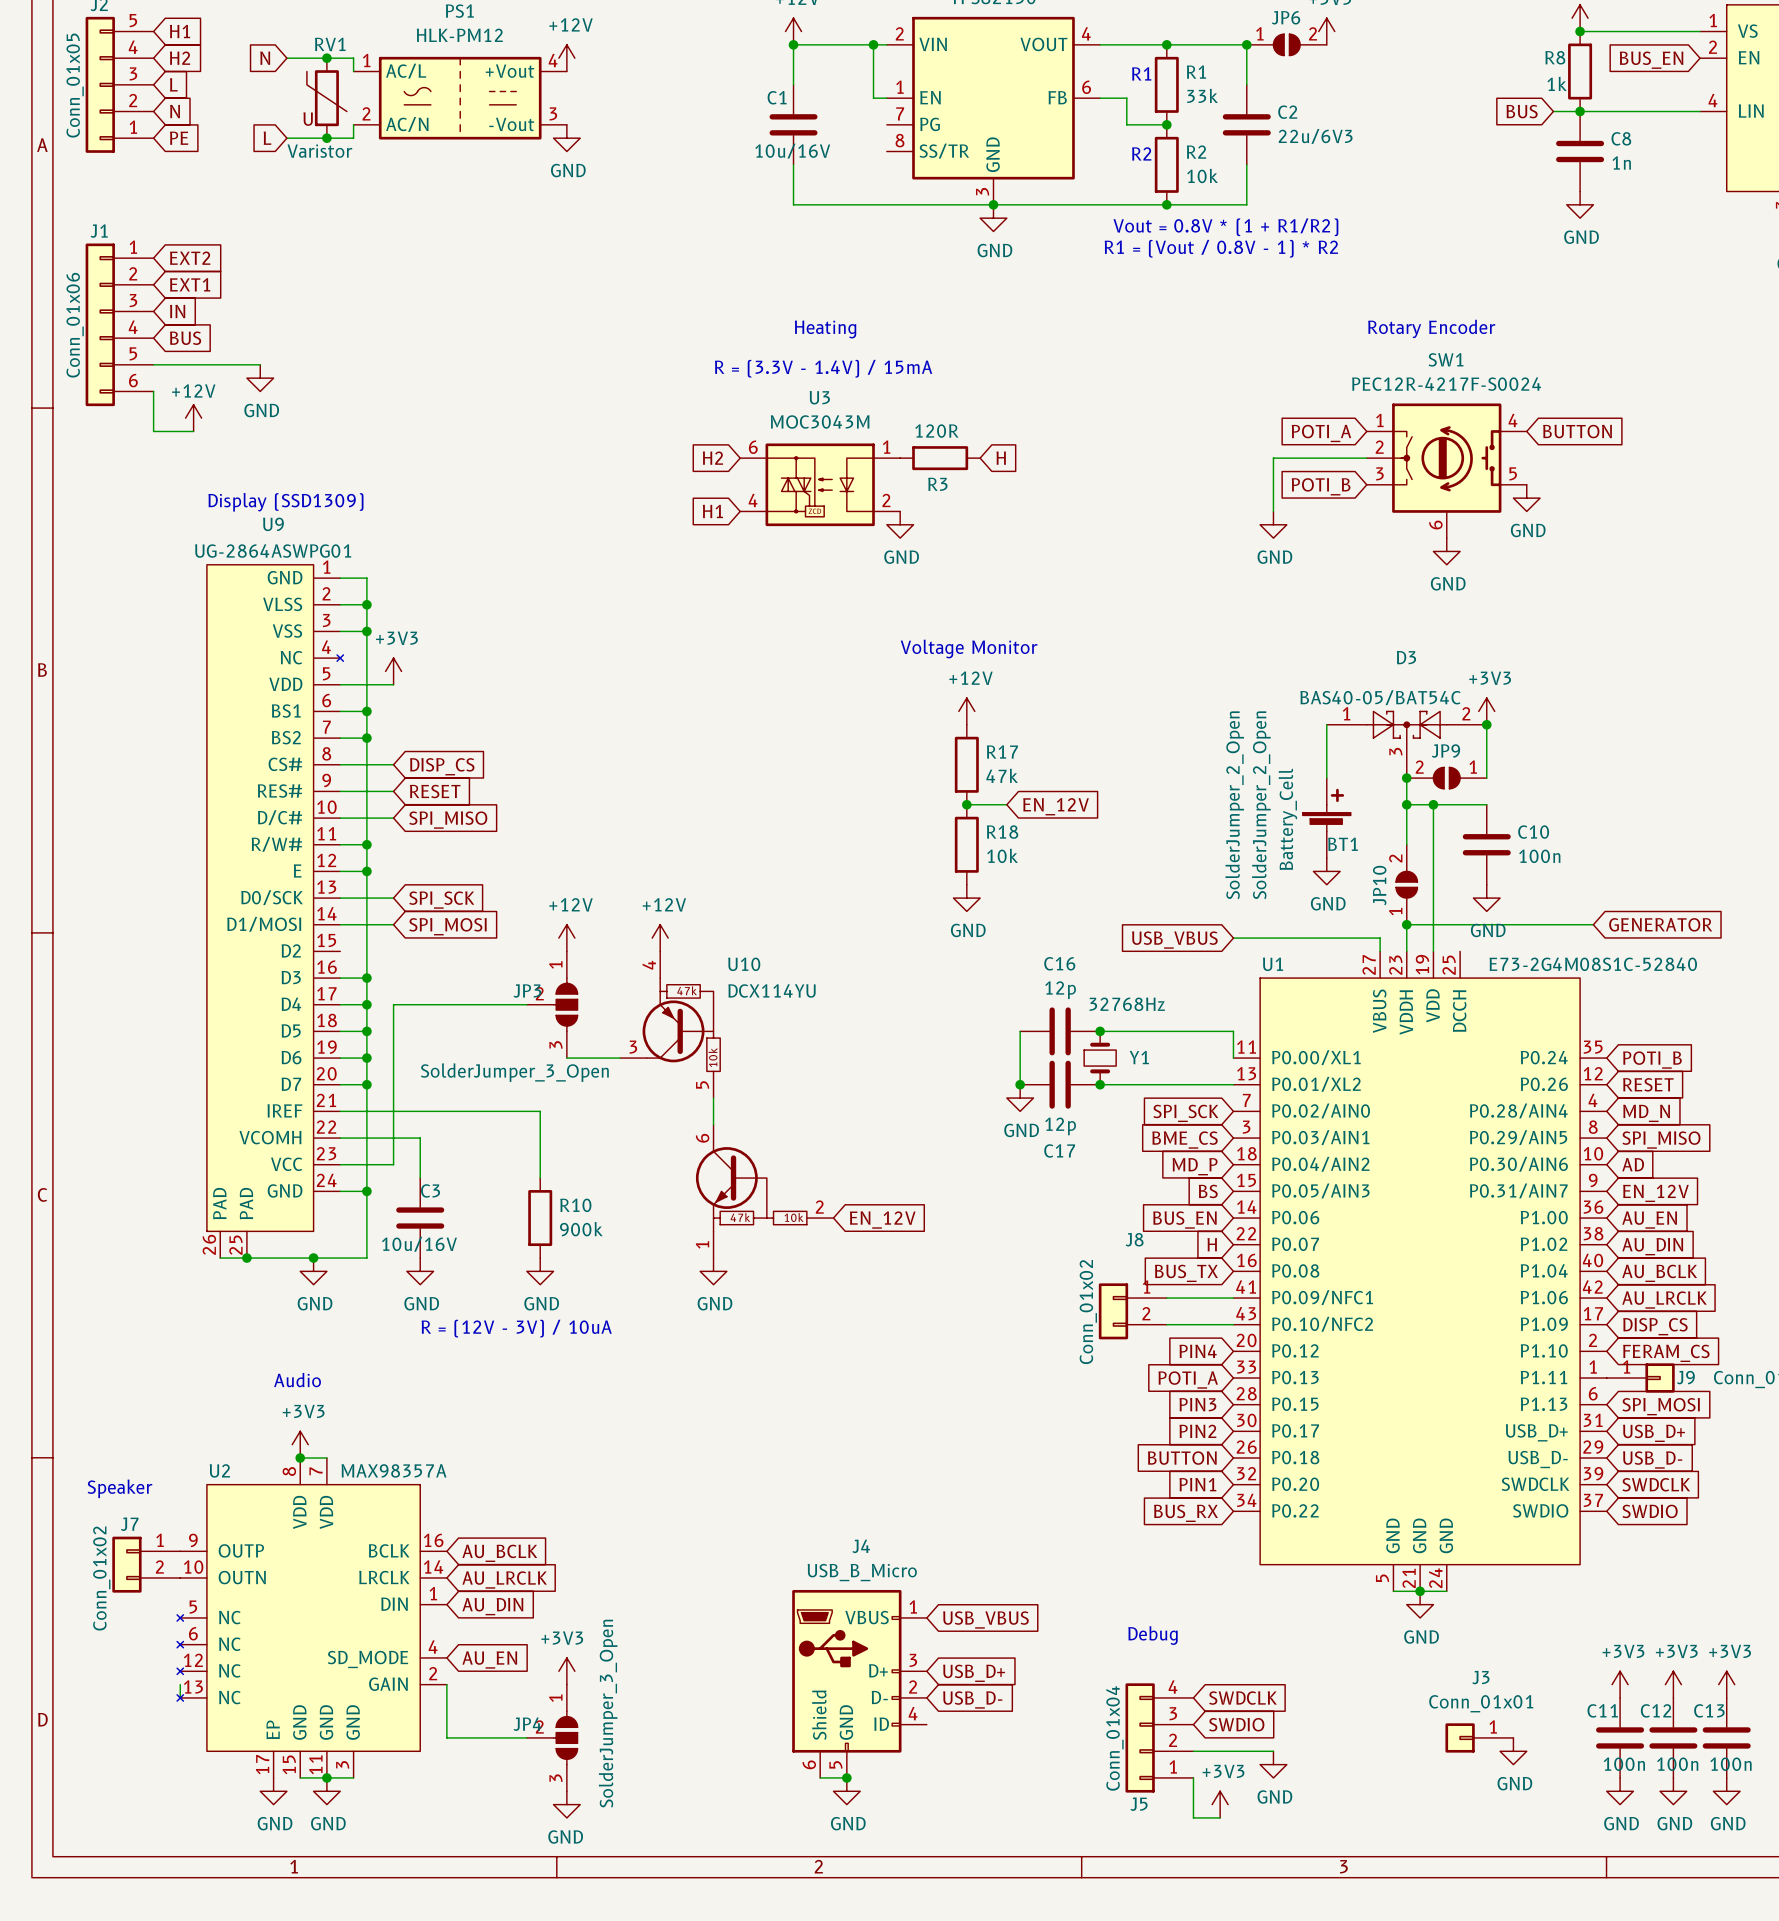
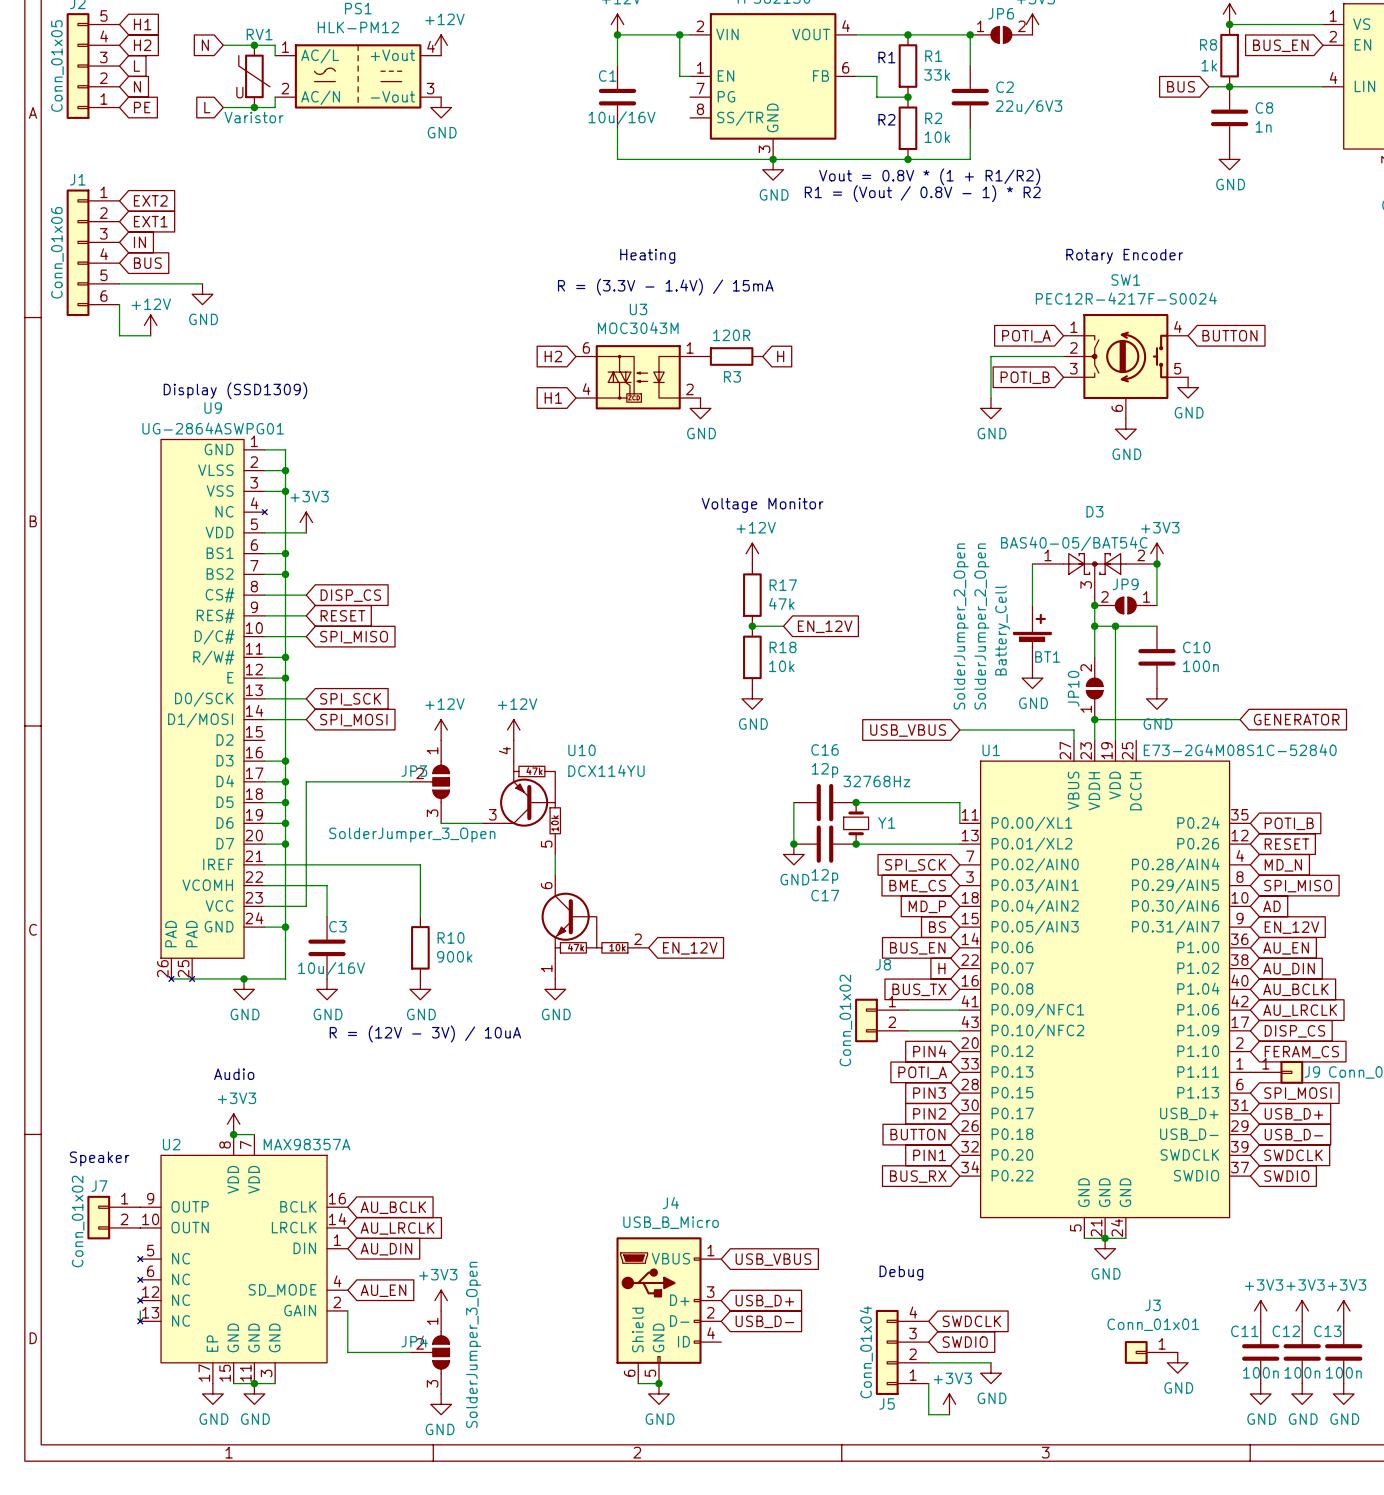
U9 symbol: [206, 564, 344, 1259] -> [161, 439, 268, 982]
junction: (246, 1258) -> none

